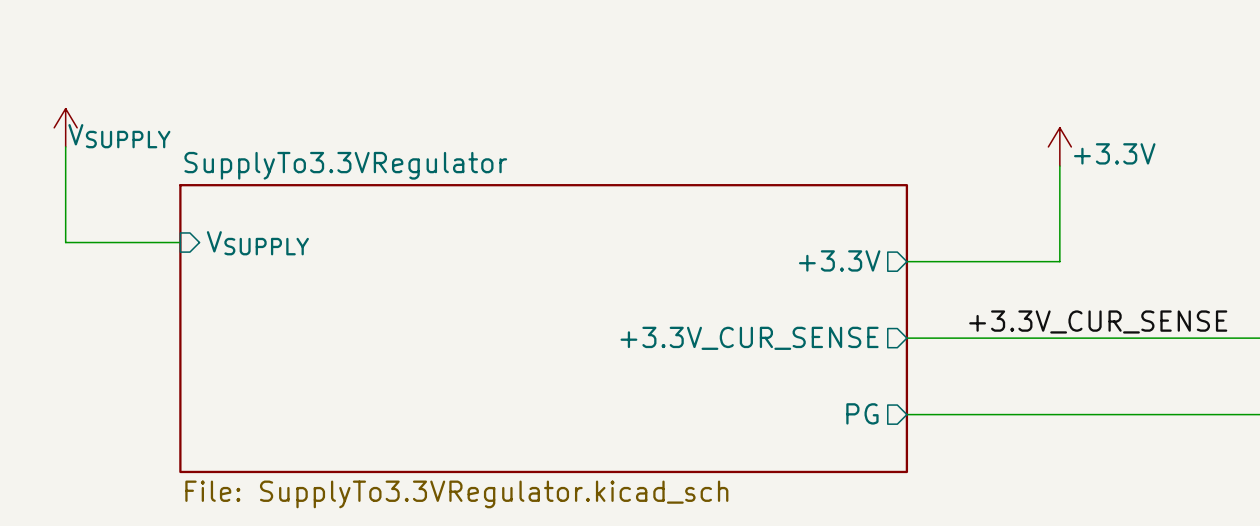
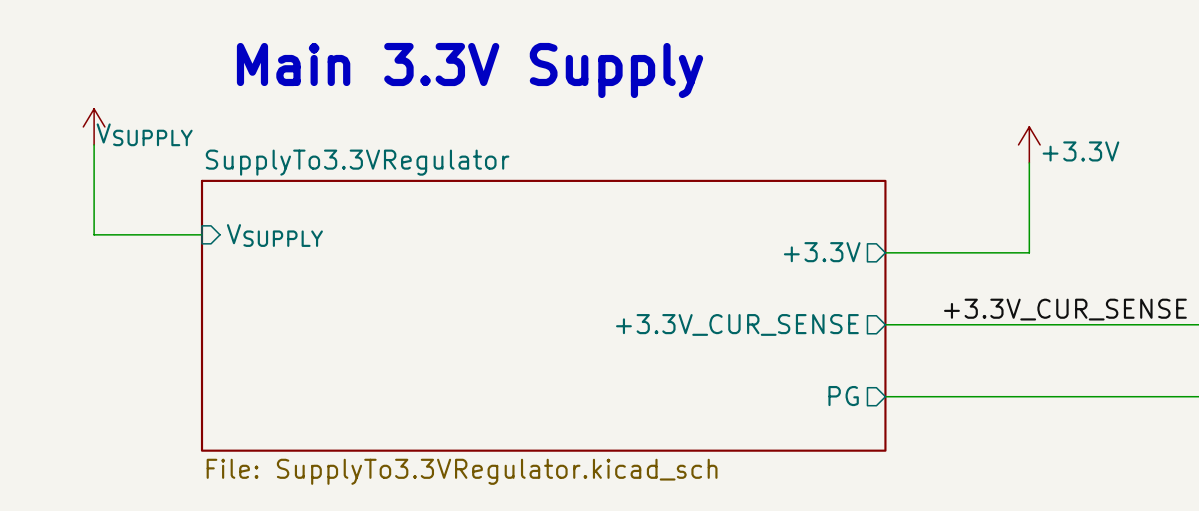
text: none -> Main 3.3V Supply (470, 70)

